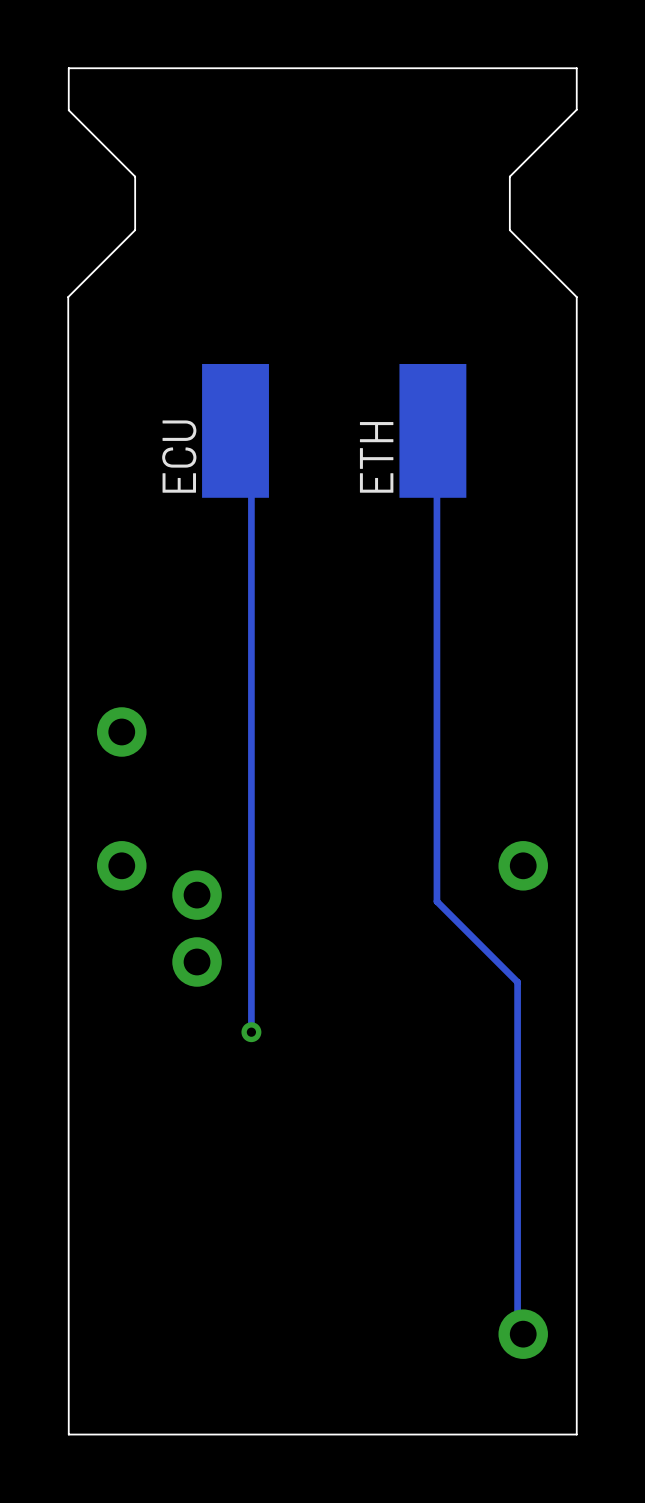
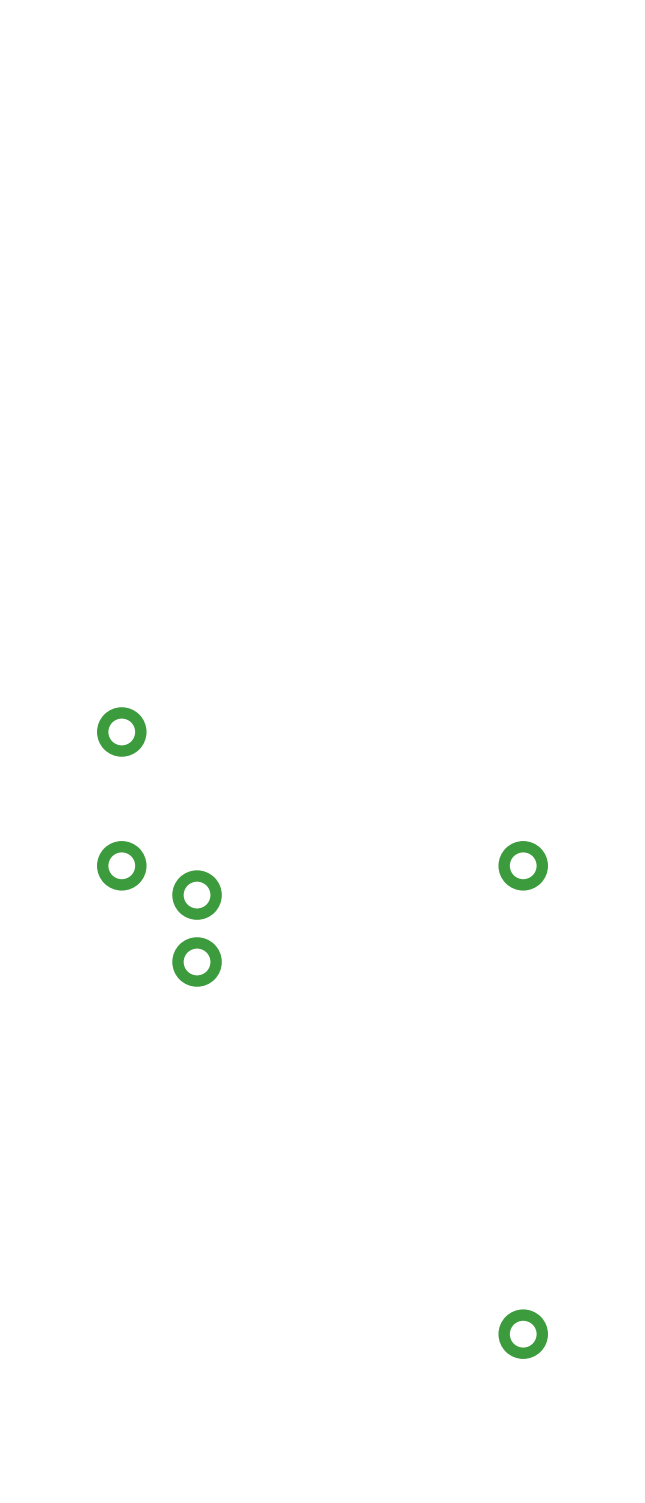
board edge: (576, 68) (68, 68) (68, 110) (135, 176) (135, 230) (68, 297) (68, 1434) (576, 1434) (576, 297) (509, 230) (509, 176) (576, 109) (576, 68) -> none
track: (235, 430) (251, 446) (251, 1032) -> none
ECU: (235, 430) -> none
track: (432, 430) (436, 430) (436, 901) (517, 982) (517, 1331) (523, 1334) -> none
ETH: (432, 430) -> none
via: (251, 1032) -> none

